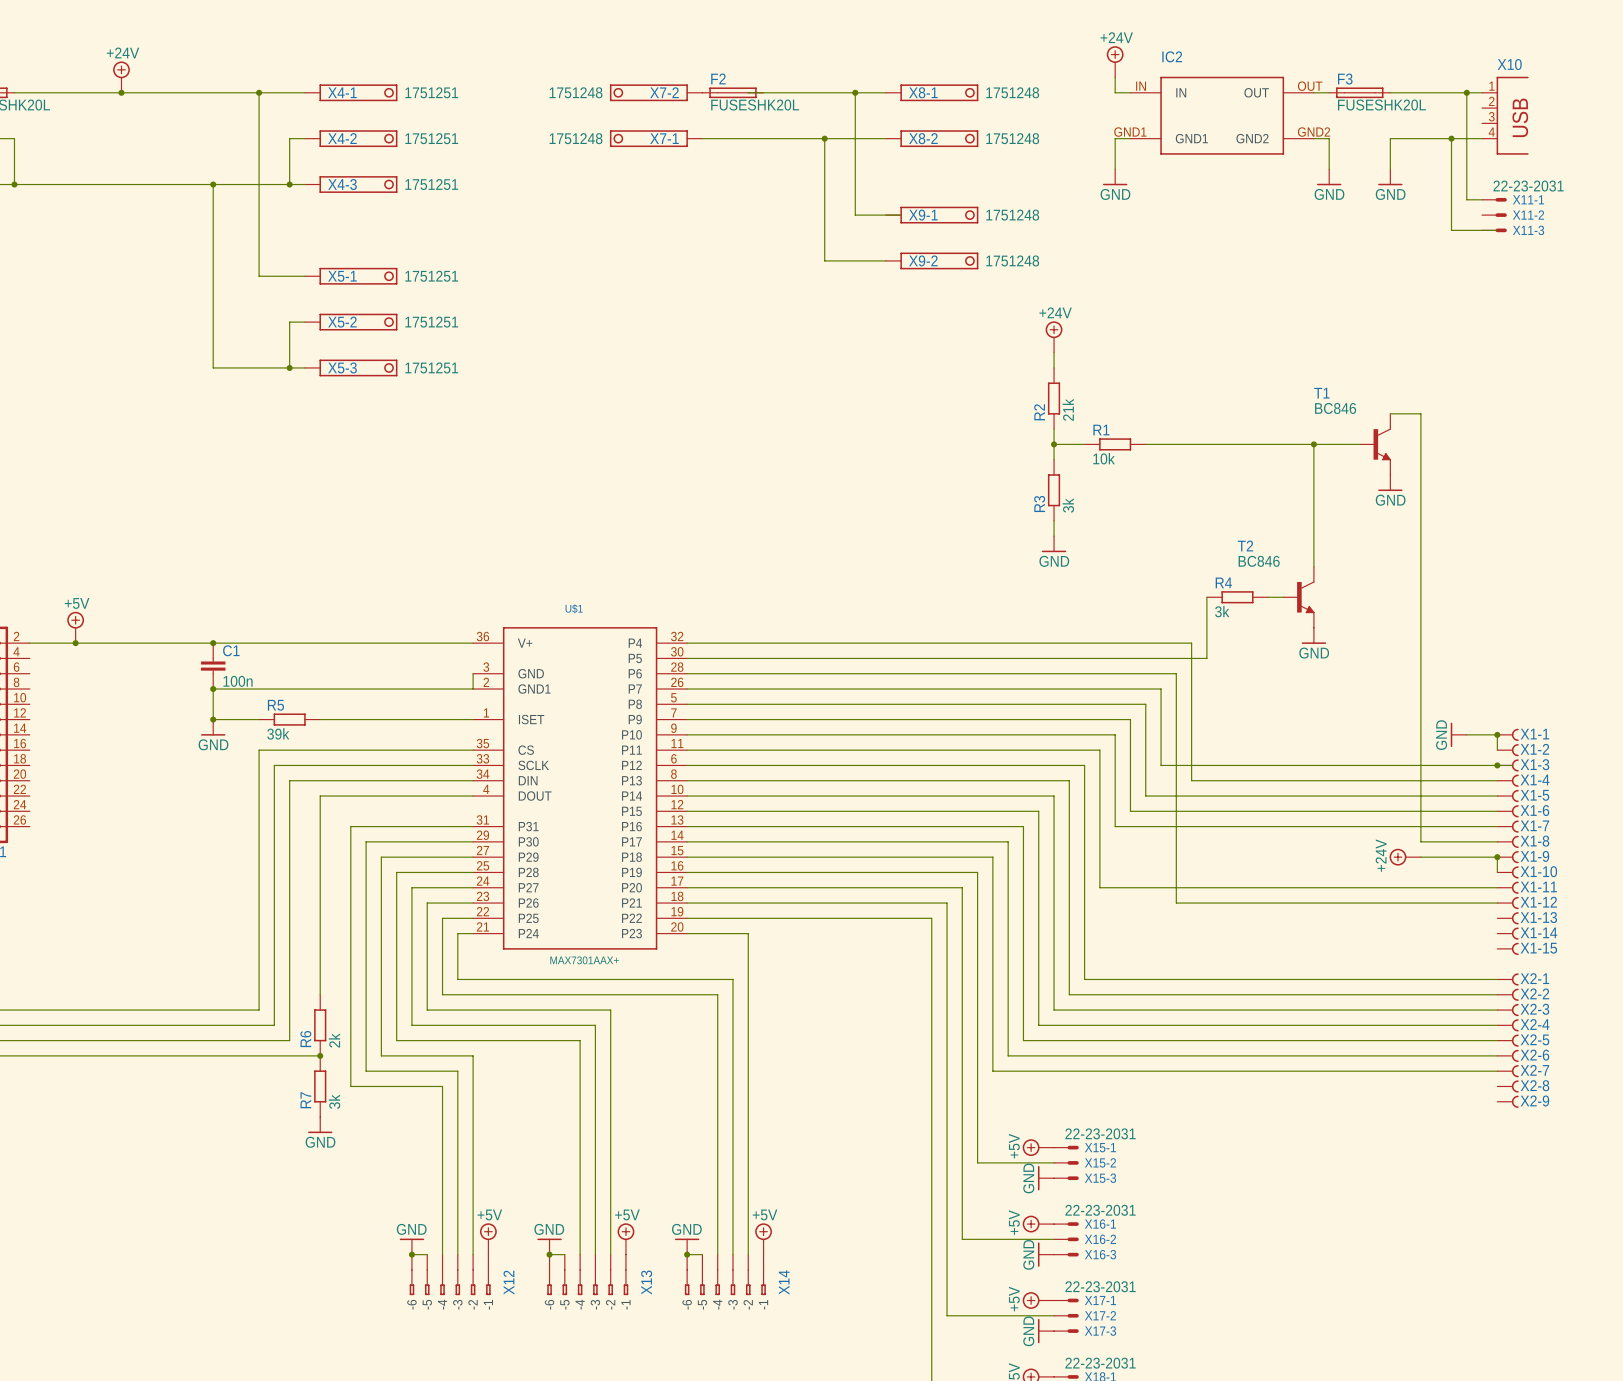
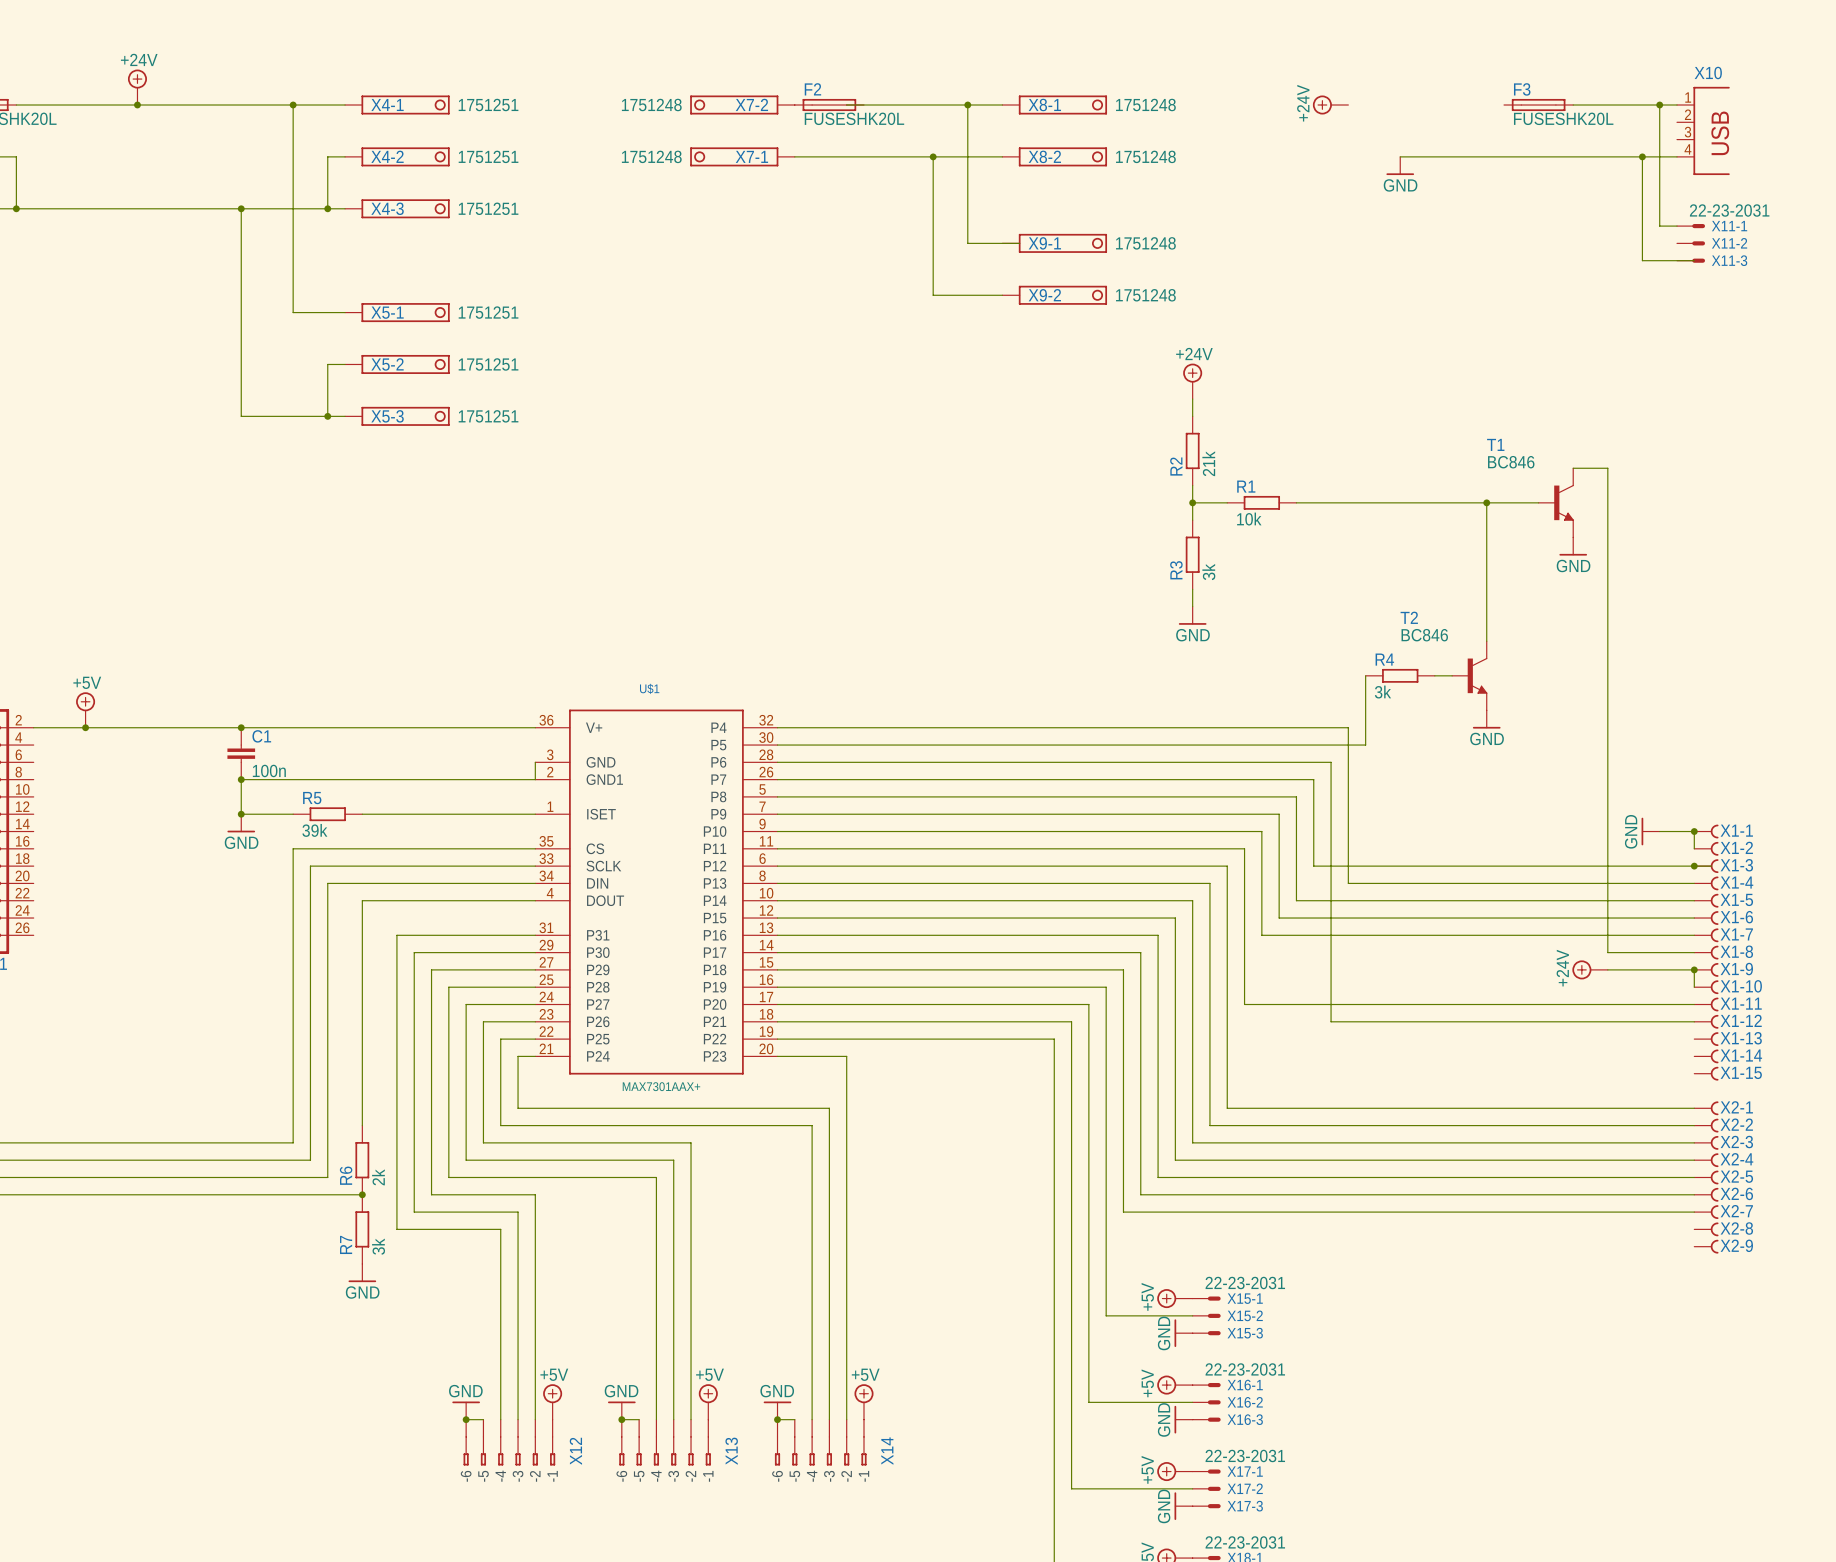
power symbol rotation: 0° (1115, 54) -> 90° counterclockwise (1322, 105)
power symbol position: +24V (1115, 61) -> +24V (1330, 105)
wire: (1115, 77) (1115, 92) (1130, 92) -> none
wire: (1313, 92) (1329, 92) -> none
IC2: (1222, 115) -> none
wire: (1130, 138) (1115, 138) (1115, 169) -> none
wire: none -> (1400, 156) (1486, 156)
wire: (1329, 138) (1329, 169) -> (1504, 156) (1573, 156)
wire: (1390, 138) (1390, 169) -> none
power symbol: none -> GND (1400, 165)
power symbol: GND (1115, 177) -> none
power symbol: GND (1329, 177) -> none
power symbol: GND (1390, 177) -> none

